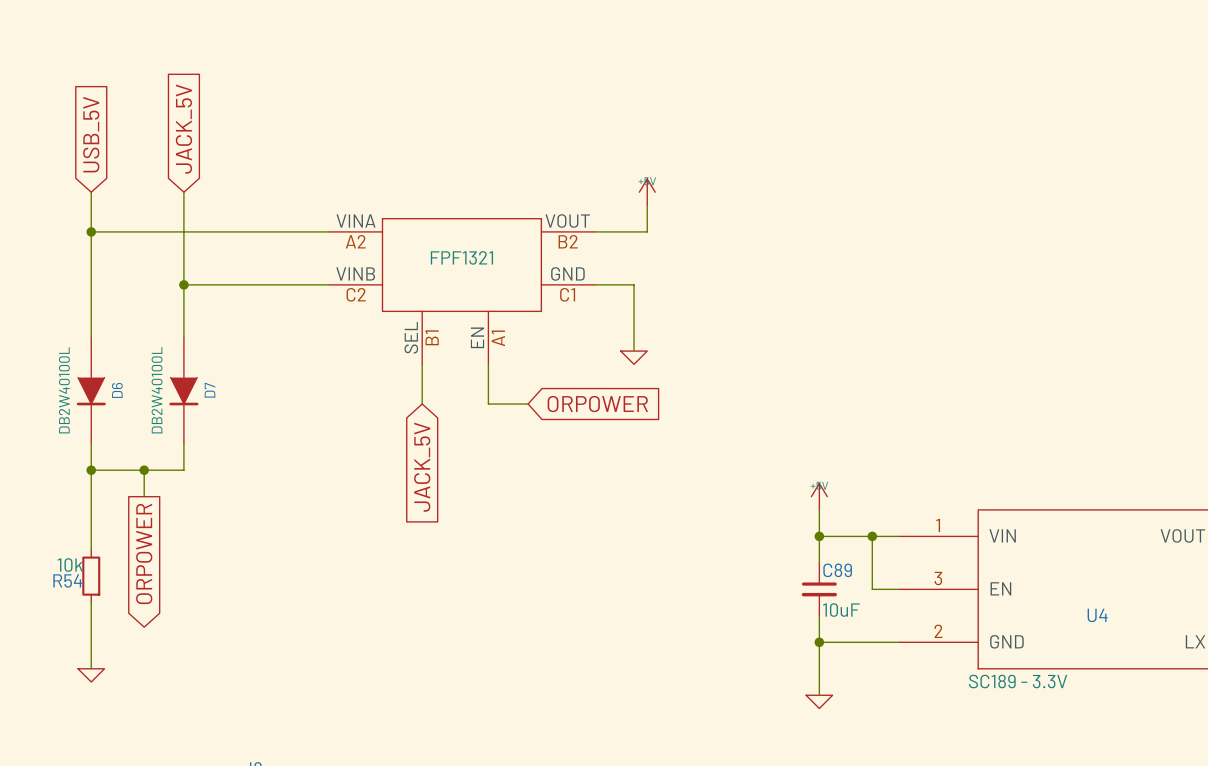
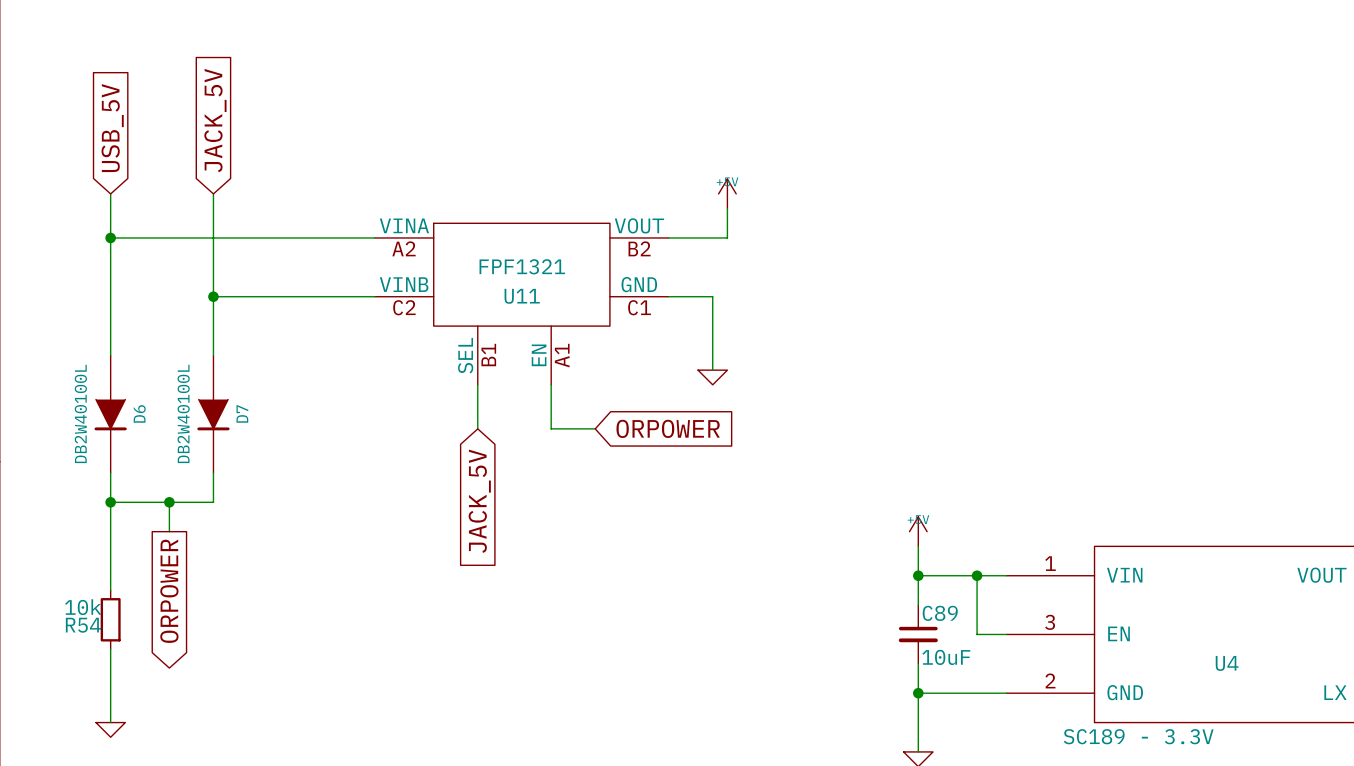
U11: none -> FPF1321 (521, 304)

